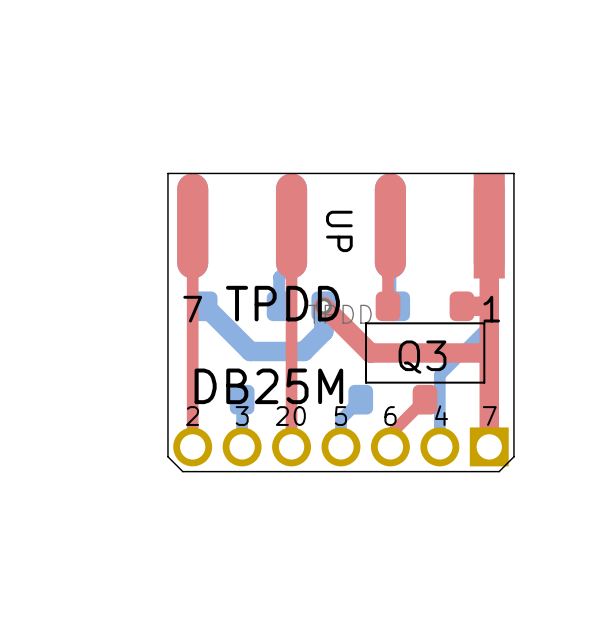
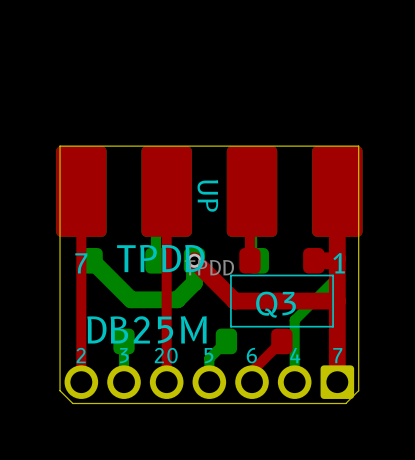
part footprint: [177, 173, 505, 279] -> [56, 146, 363, 237]
part footprint: [173, 427, 509, 467] -> [64, 365, 355, 399]

